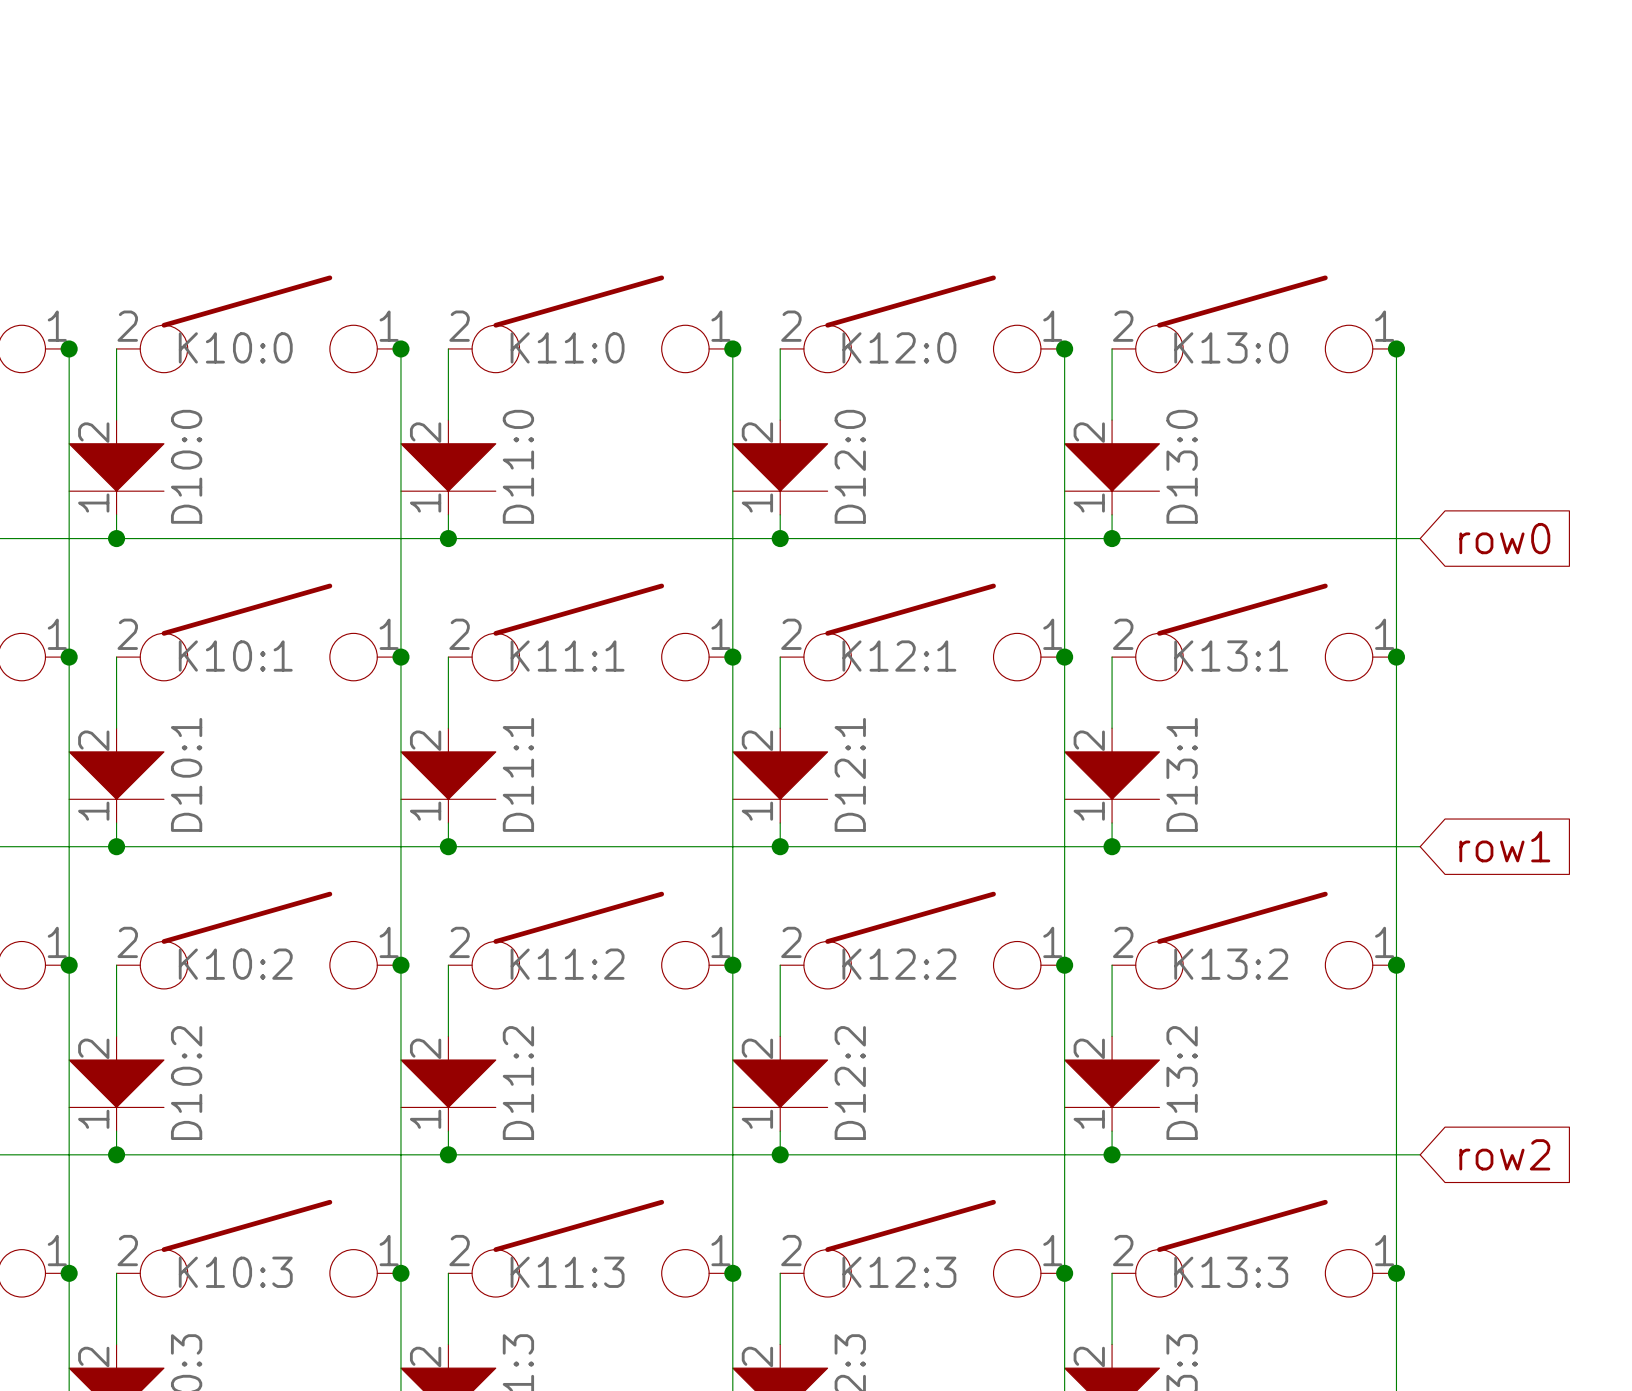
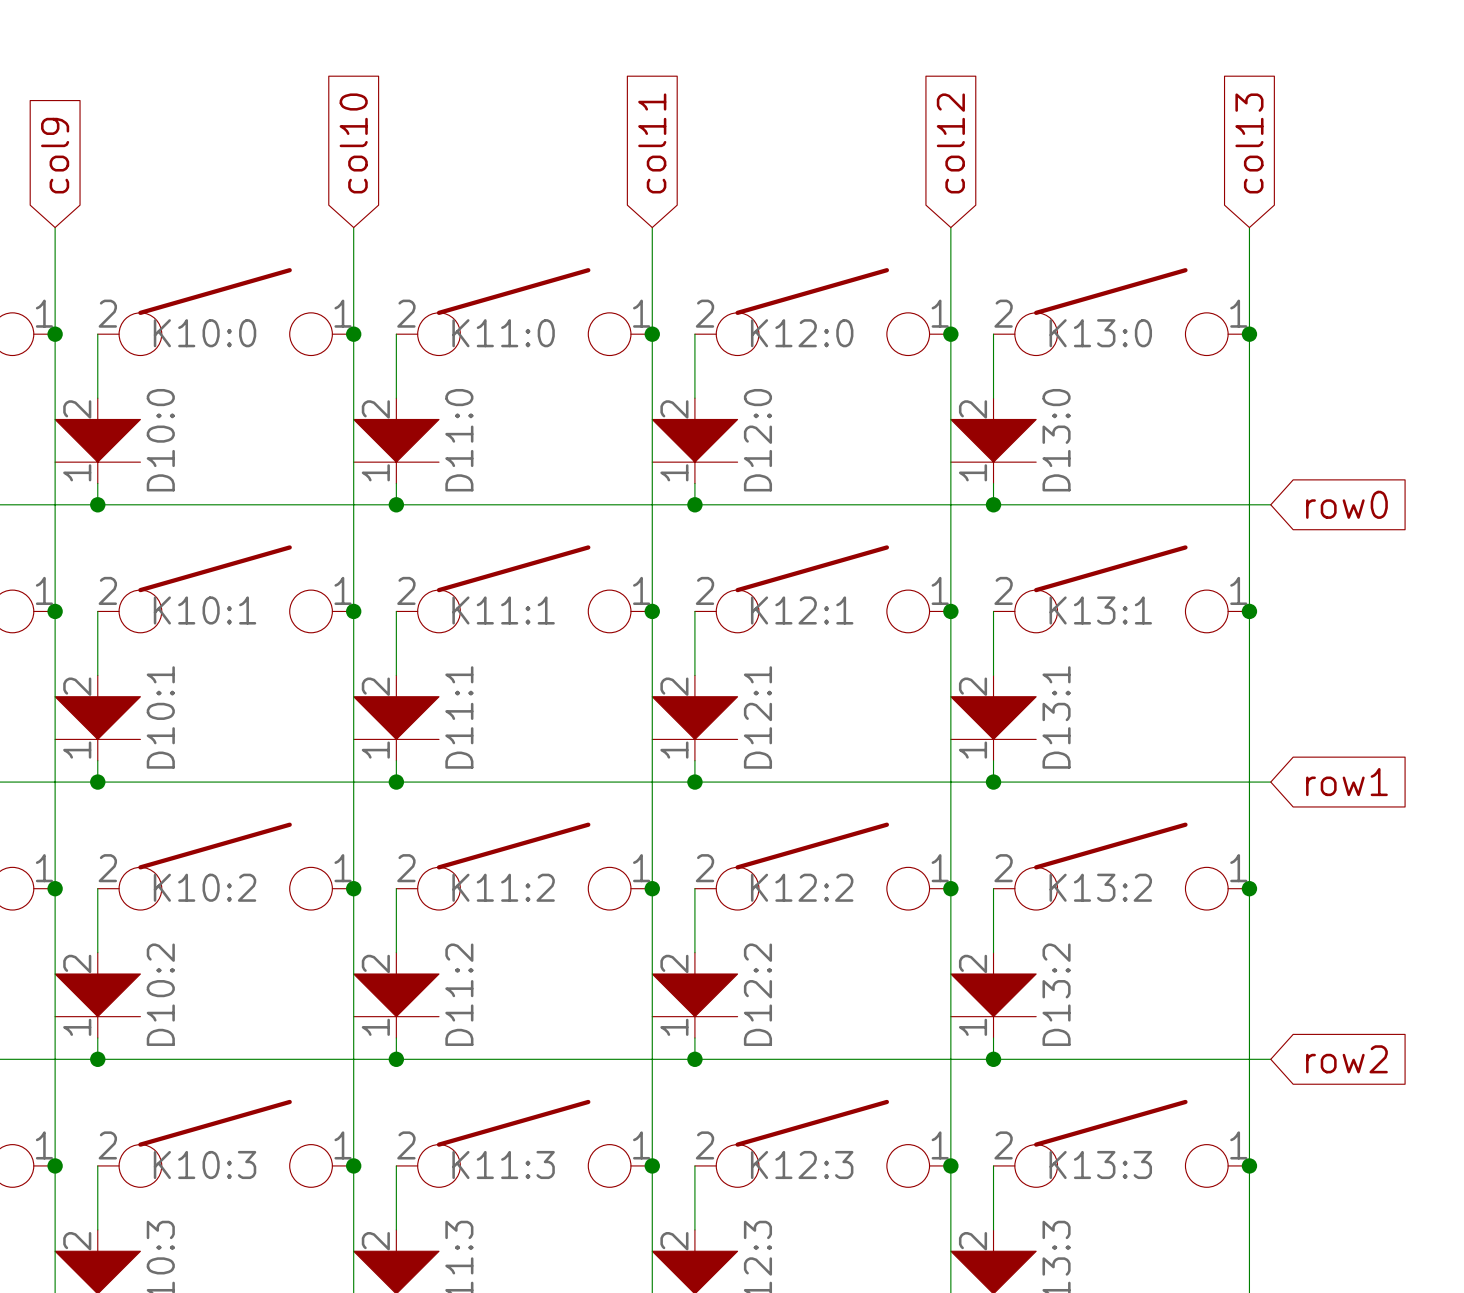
global label: none -> col10 (353, 143)
global label: none -> col11 (652, 143)
global label: none -> col12 (950, 143)
global label: none -> col13 (1249, 143)
global label: none -> col9 (55, 155)
wire: none -> (55, 227) (55, 334)
wire: none -> (353, 227) (353, 334)
wire: none -> (652, 227) (652, 334)
wire: none -> (950, 227) (950, 334)
wire: none -> (1249, 227) (1249, 334)

